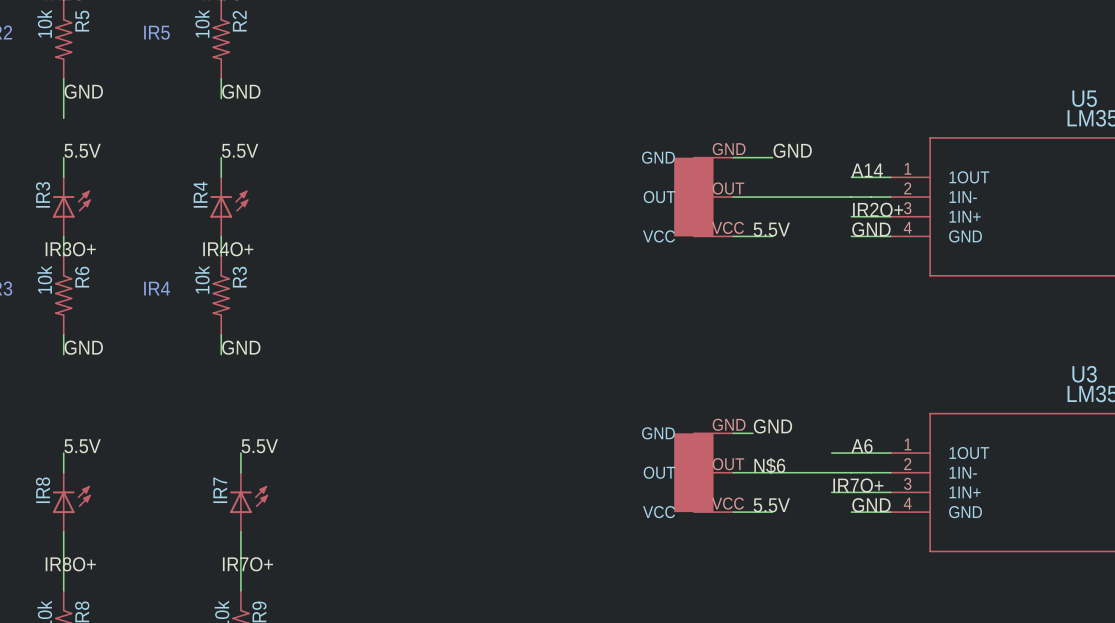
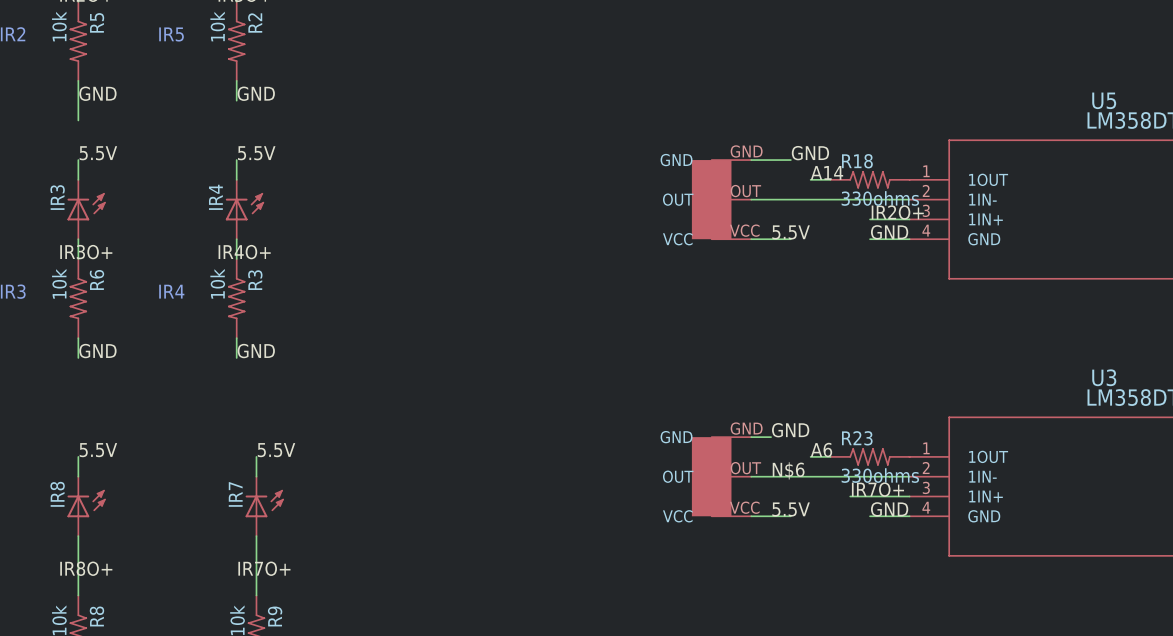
label position: A14 (867, 170) -> A14 (826, 172)
wire: none -> (810, 179) (830, 179)
R18: none -> 330ohms (870, 179)
label position: A6 (862, 446) -> A6 (821, 449)
wire: none -> (810, 456) (830, 456)
R23: none -> 330ohms (870, 456)

